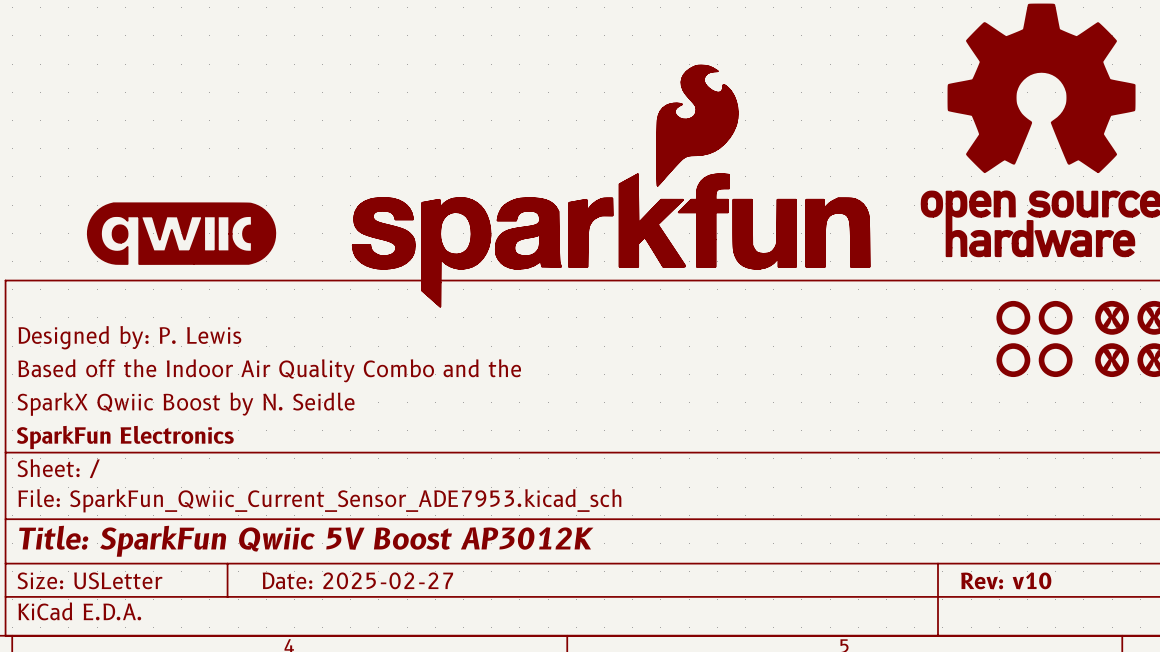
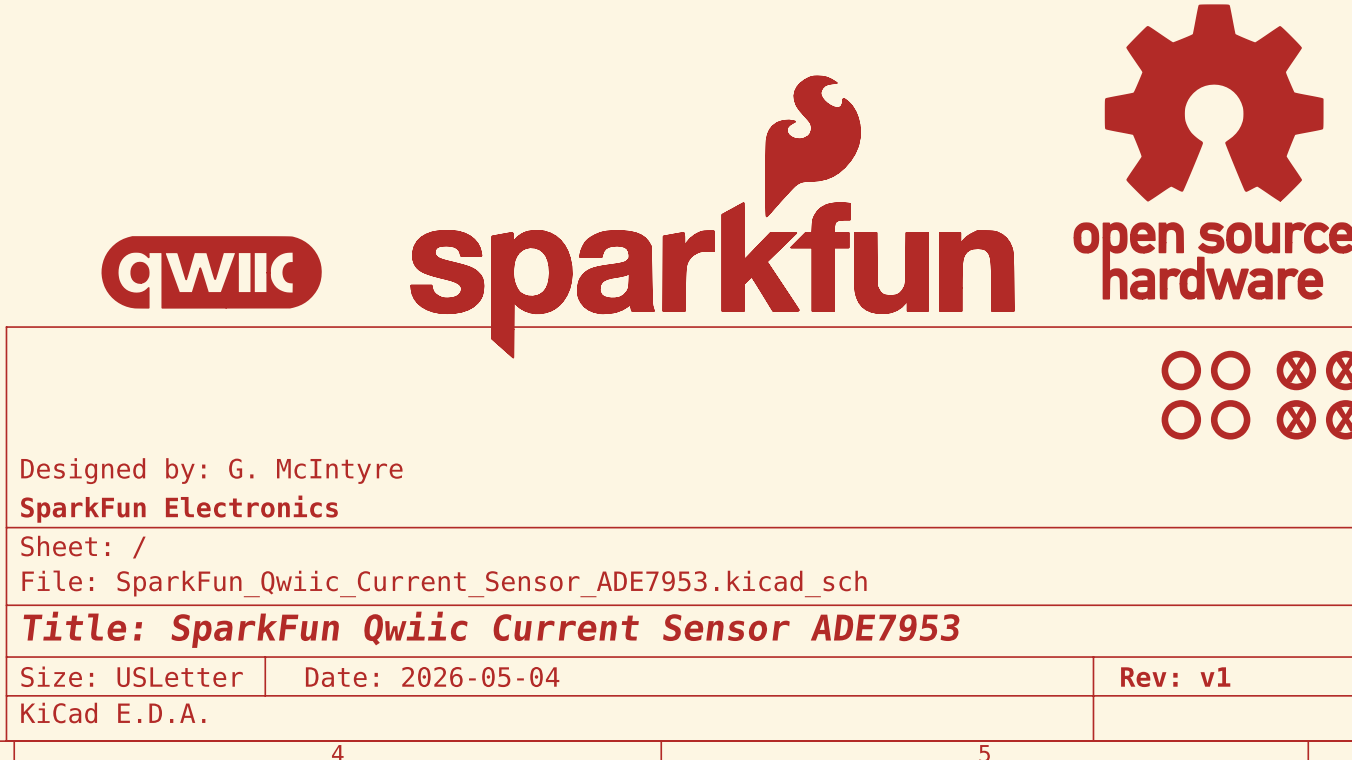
title block: Designed by: P. Lewis (129, 337) -> none
title block: Based off the Indoor Air Quality Combo and the (269, 370) -> none
title block: SparkX Qwiic Boost by N. Seidle (186, 404) -> Designed by: G. McIntyre (211, 471)
title block: Title: SparkFun Qwiic 5V Boost AP3012K (306, 541) -> Title: SparkFun Qwiic Current Sensor ADE7953 (491, 629)
title block: Date: 2025-02-27 (357, 580) -> Date: 2026-05-04 (432, 677)
title block: Rev: v10 (1006, 580) -> Rev: v1 (1175, 677)

